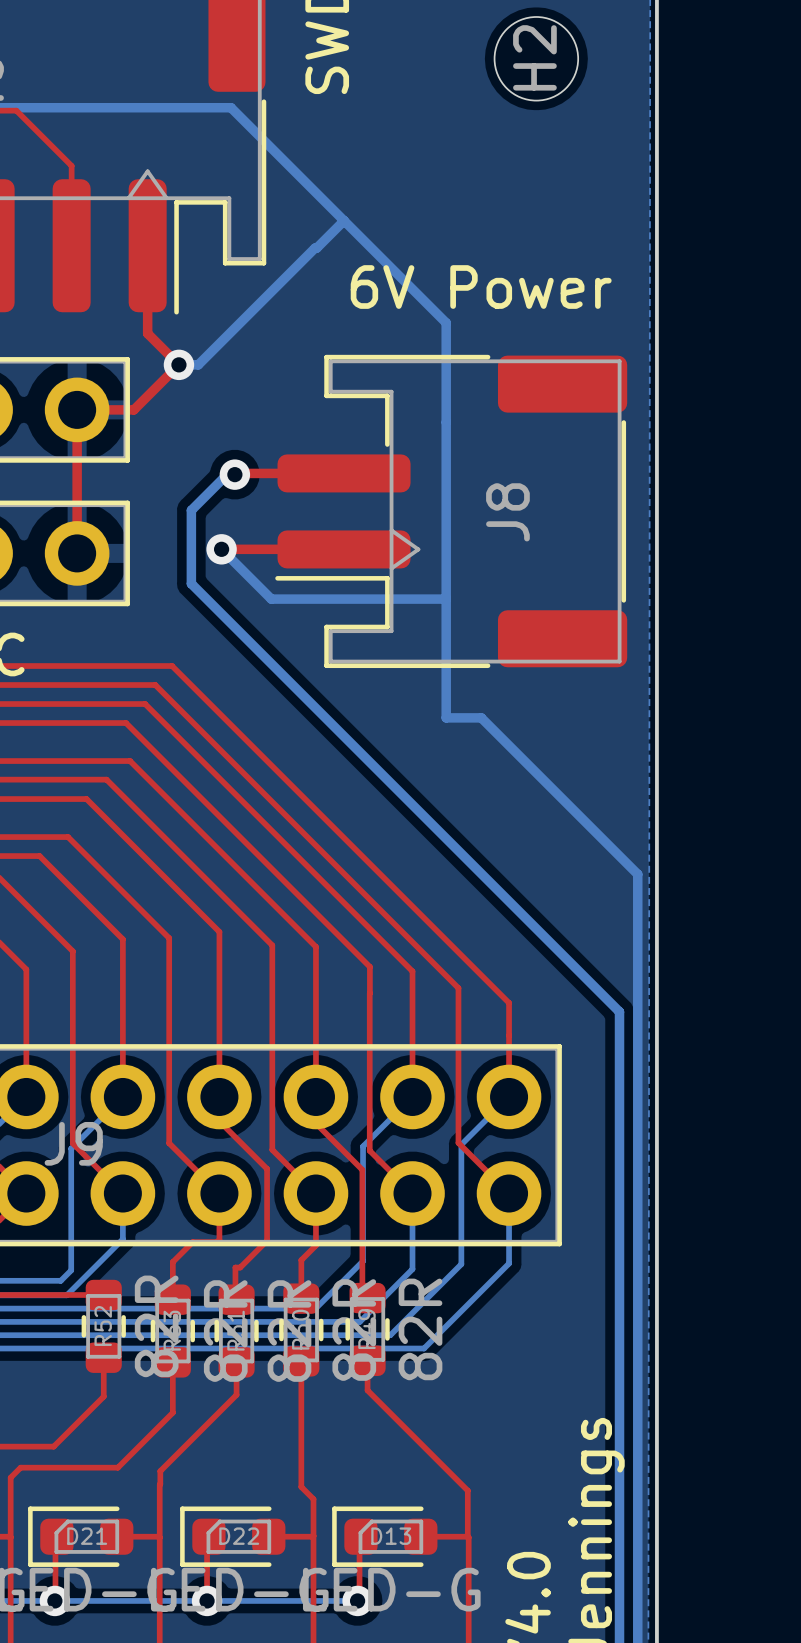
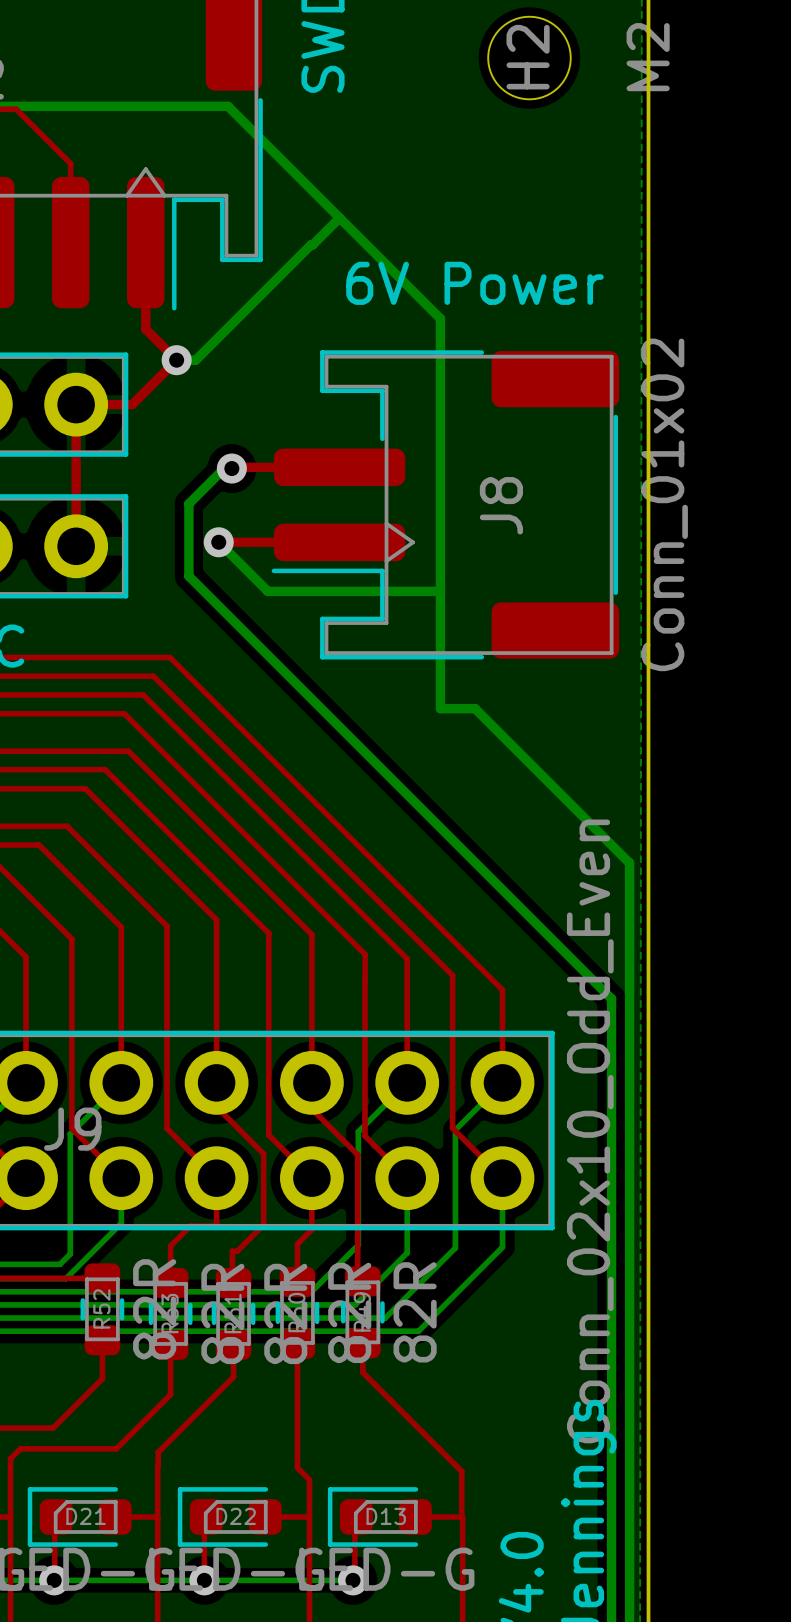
H2 value: none -> M2 (648, 57)
J8 value: none -> Conn_01x02 (664, 504)
J9 value: none -> Conn_02x10_Odd_Even (590, 1131)

